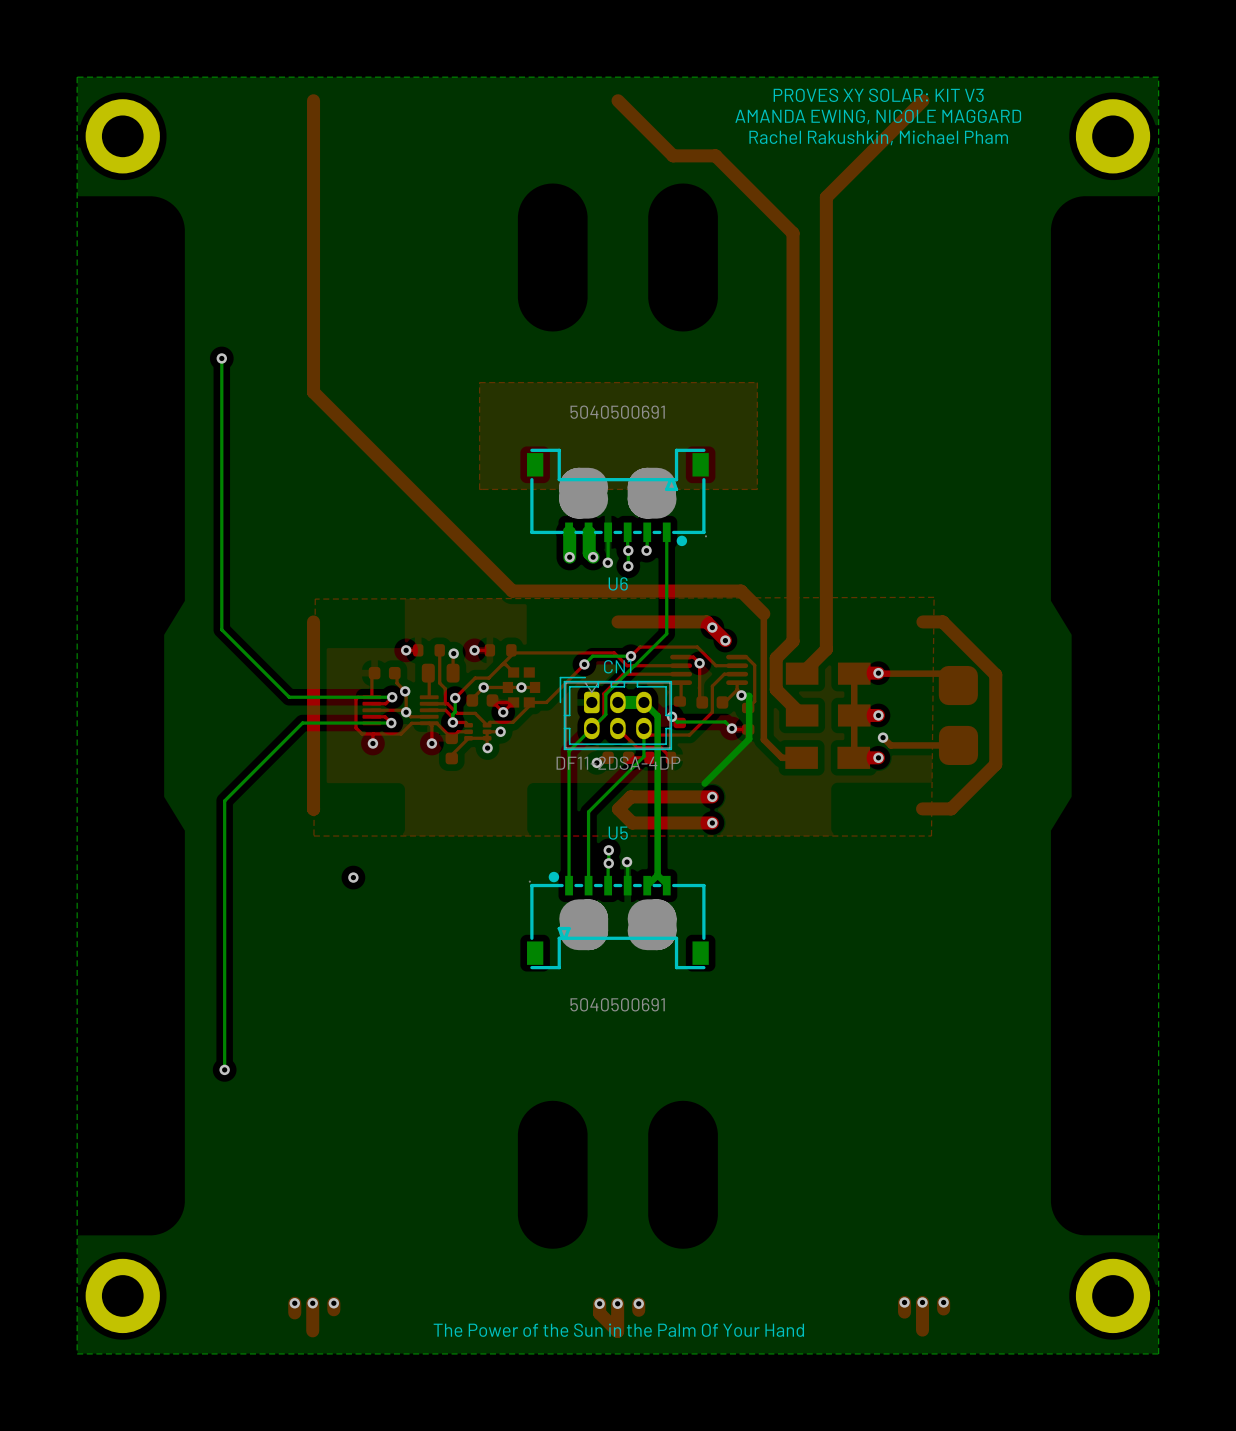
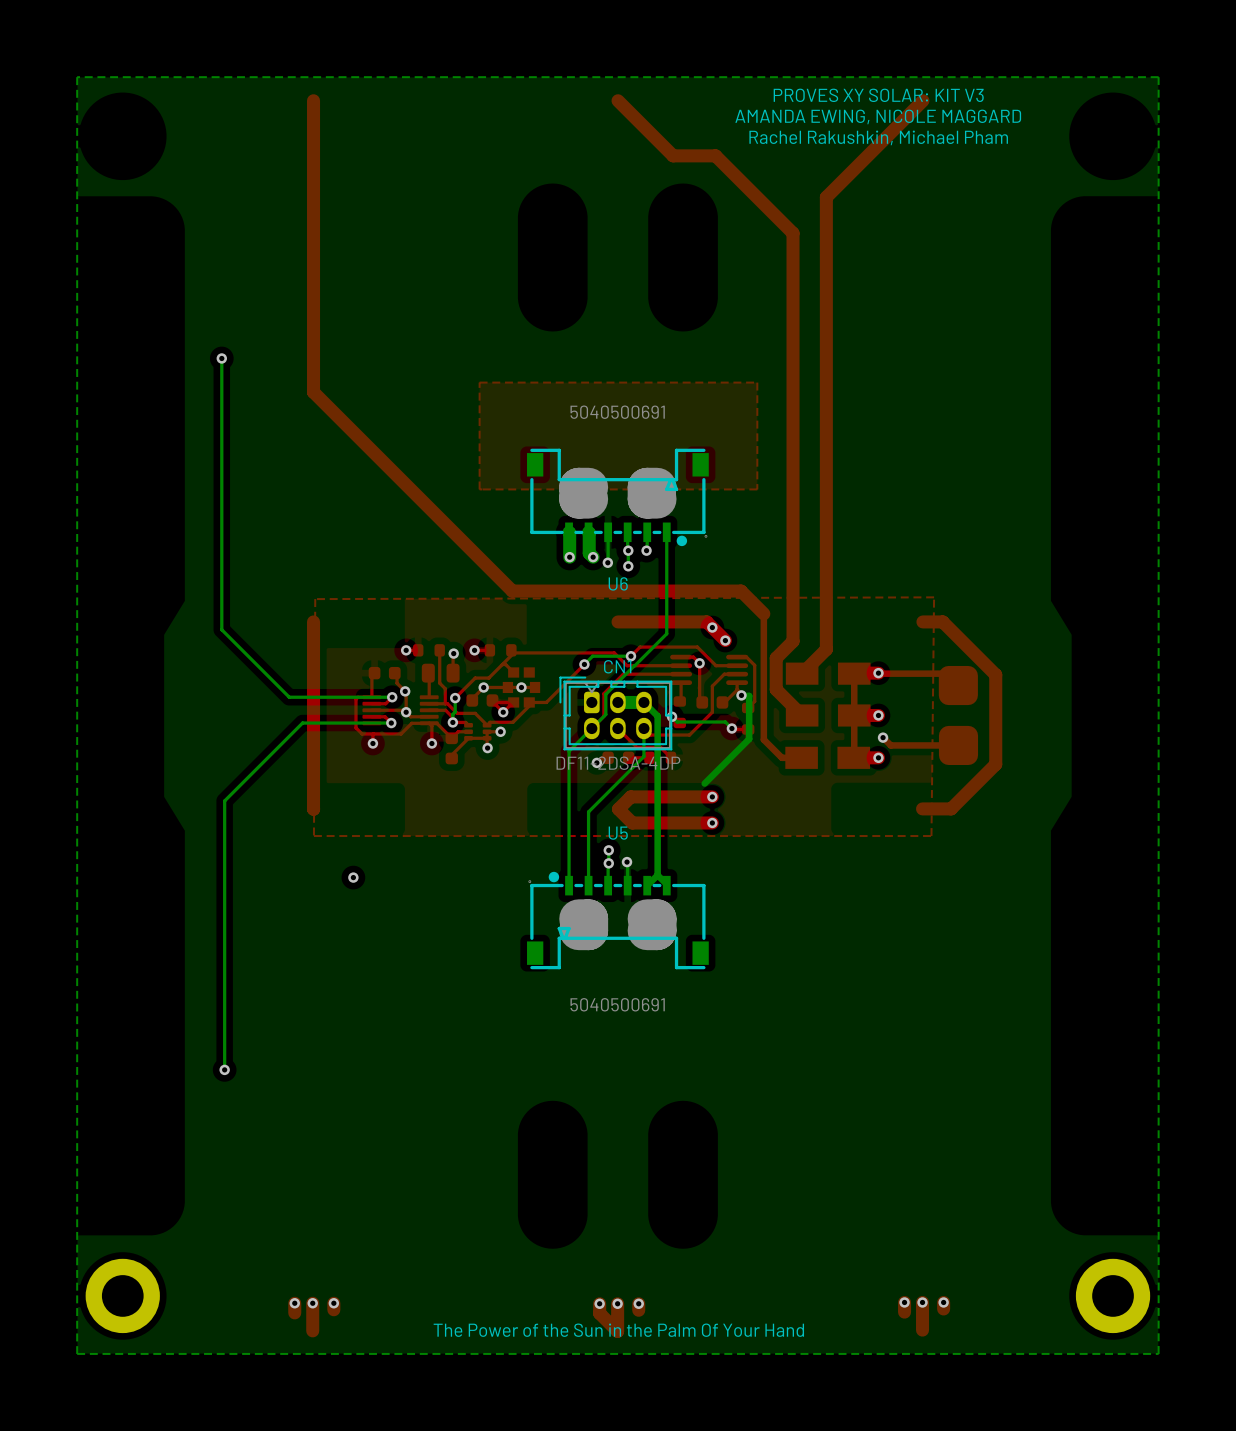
part: (122, 136) -> none
part: (1113, 136) -> none

